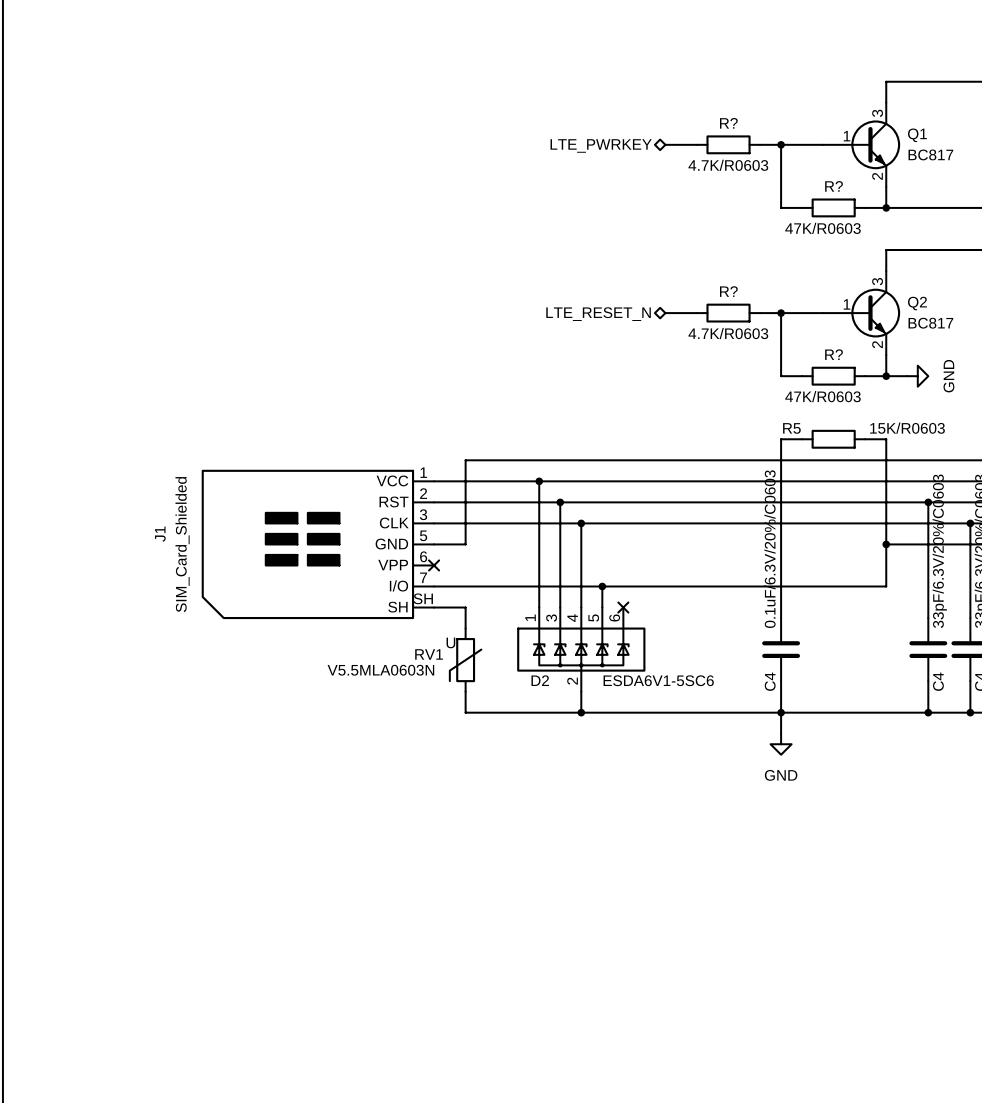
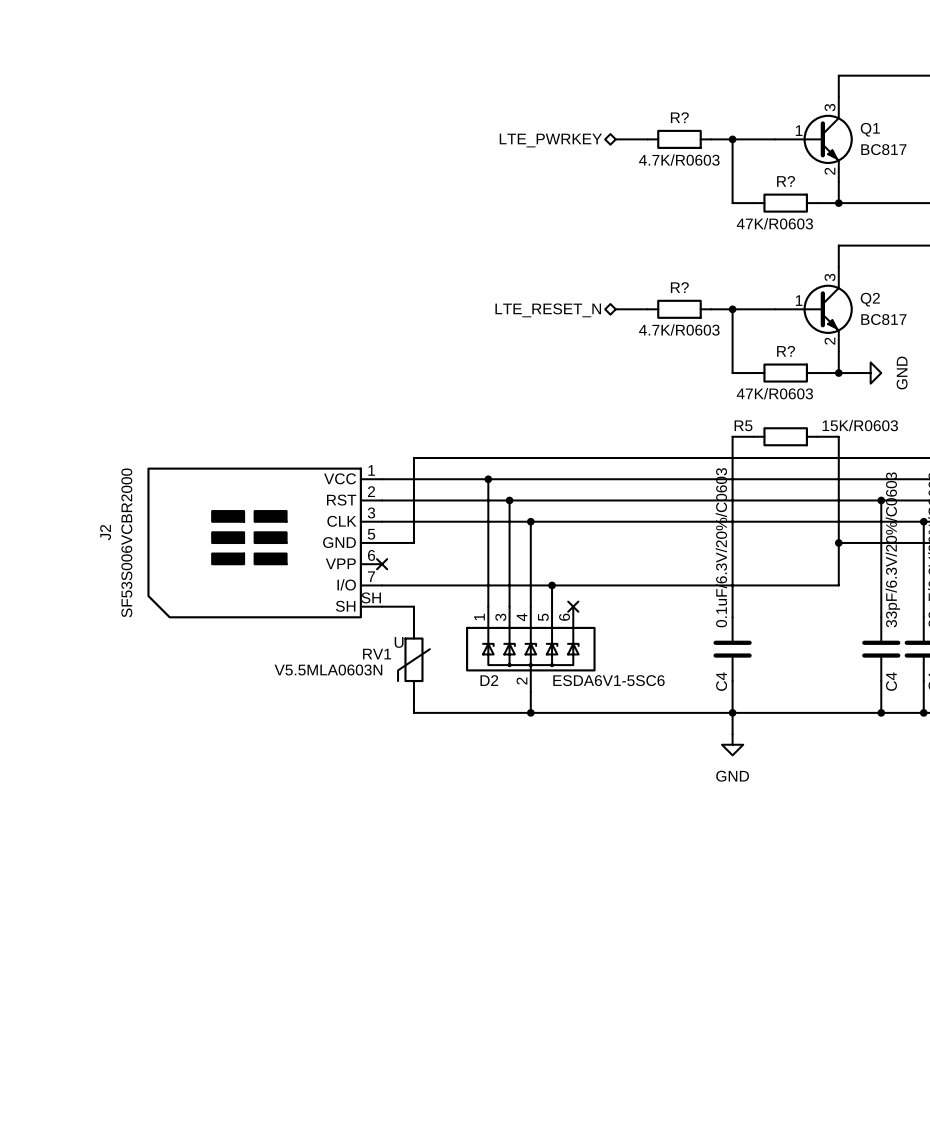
J1 name: J1 (160, 534) -> J2 (105, 532)
J1 value: SIM_Card_Shielded (182, 544) -> SF53S006VCBR2000 (126, 542)

